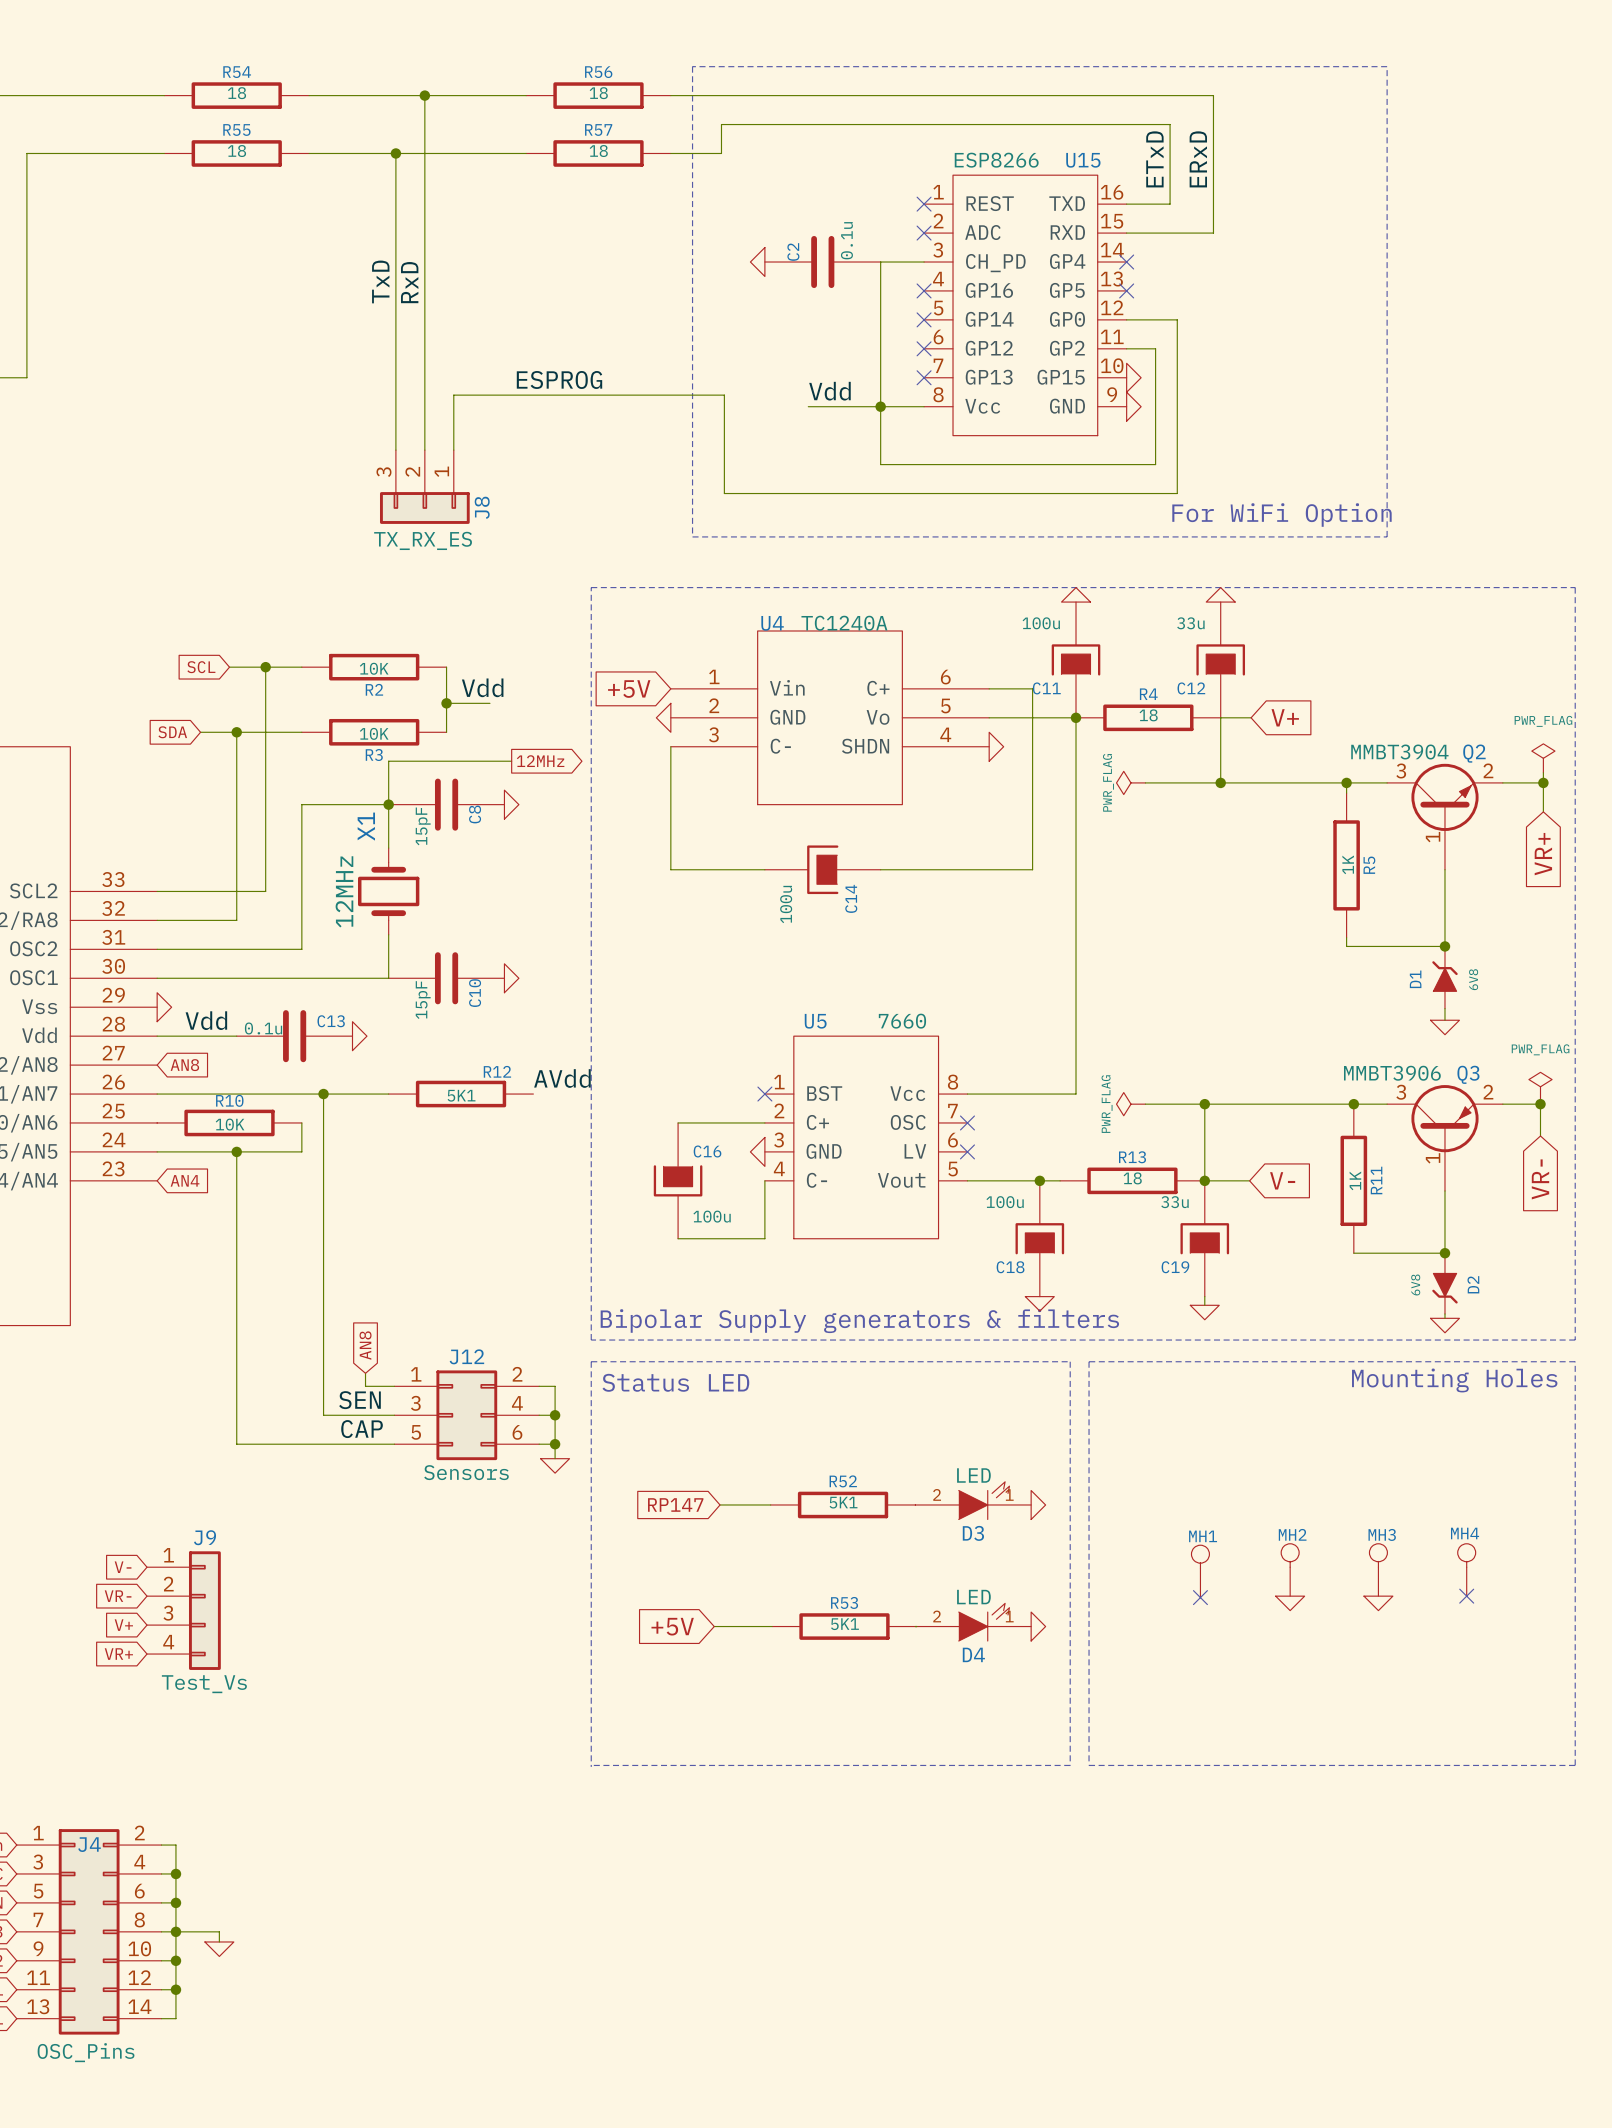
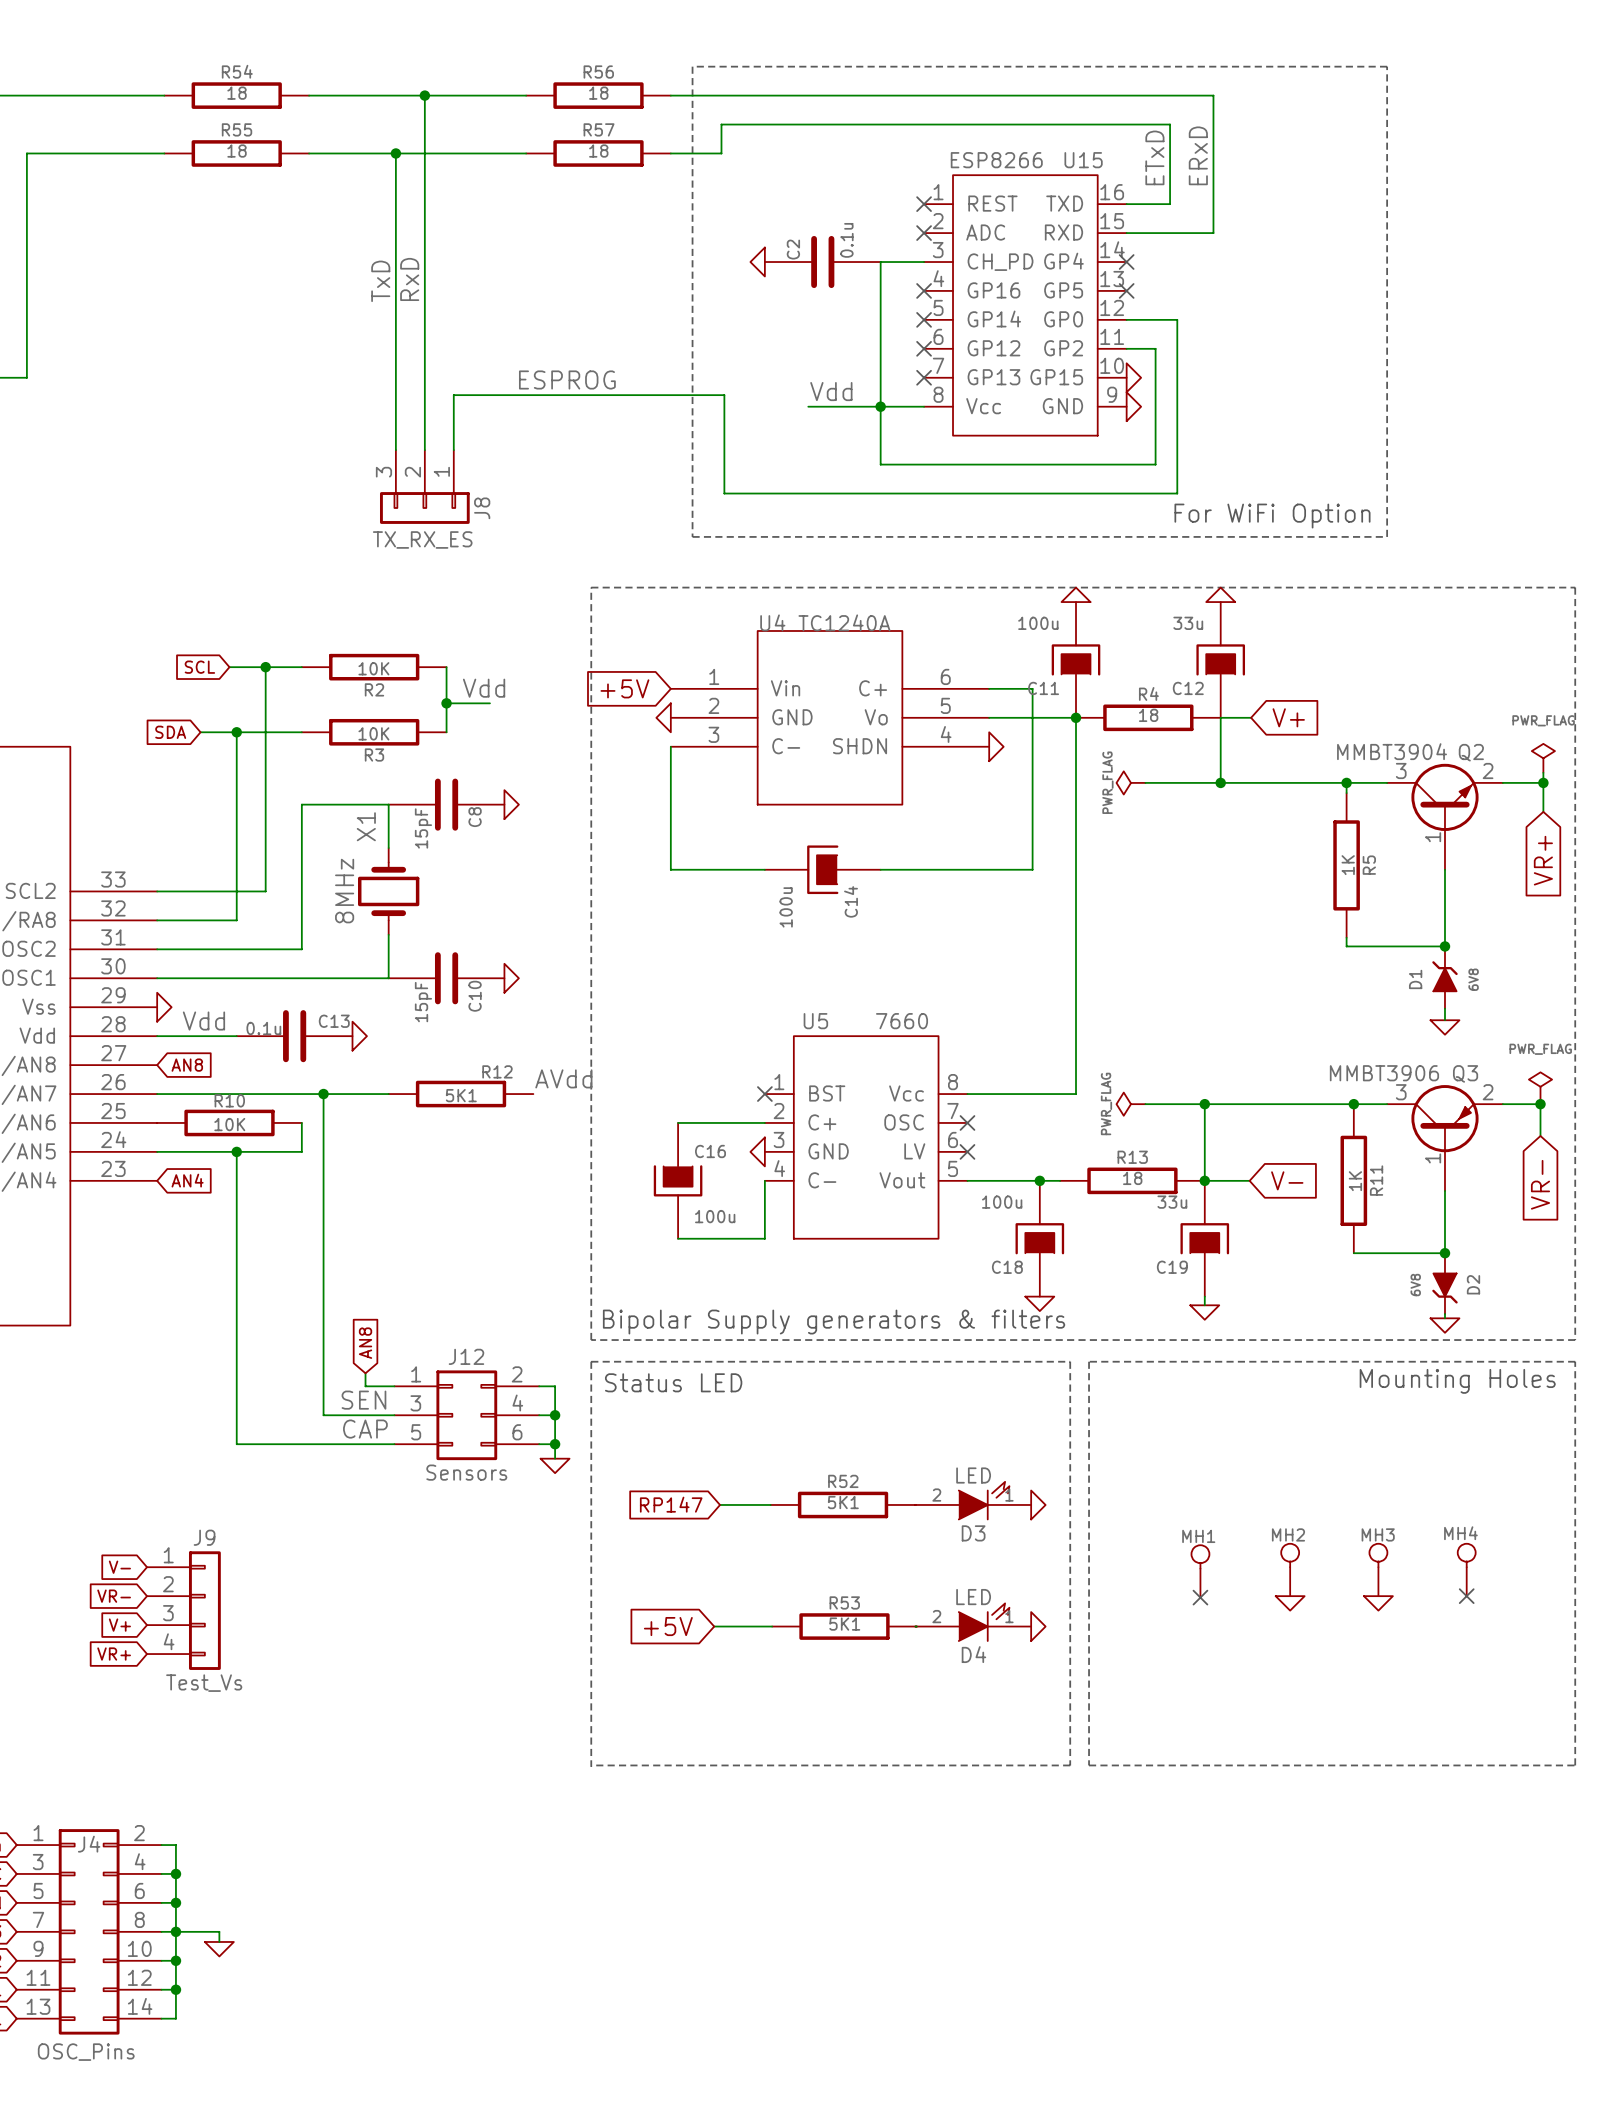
wire: (511, 761) (388, 761) (388, 804) -> none
global label: 12MHz (540, 761) -> none
junction: (388, 804) -> none
X1 value: 12MHz (344, 891) -> 8MHz (344, 891)

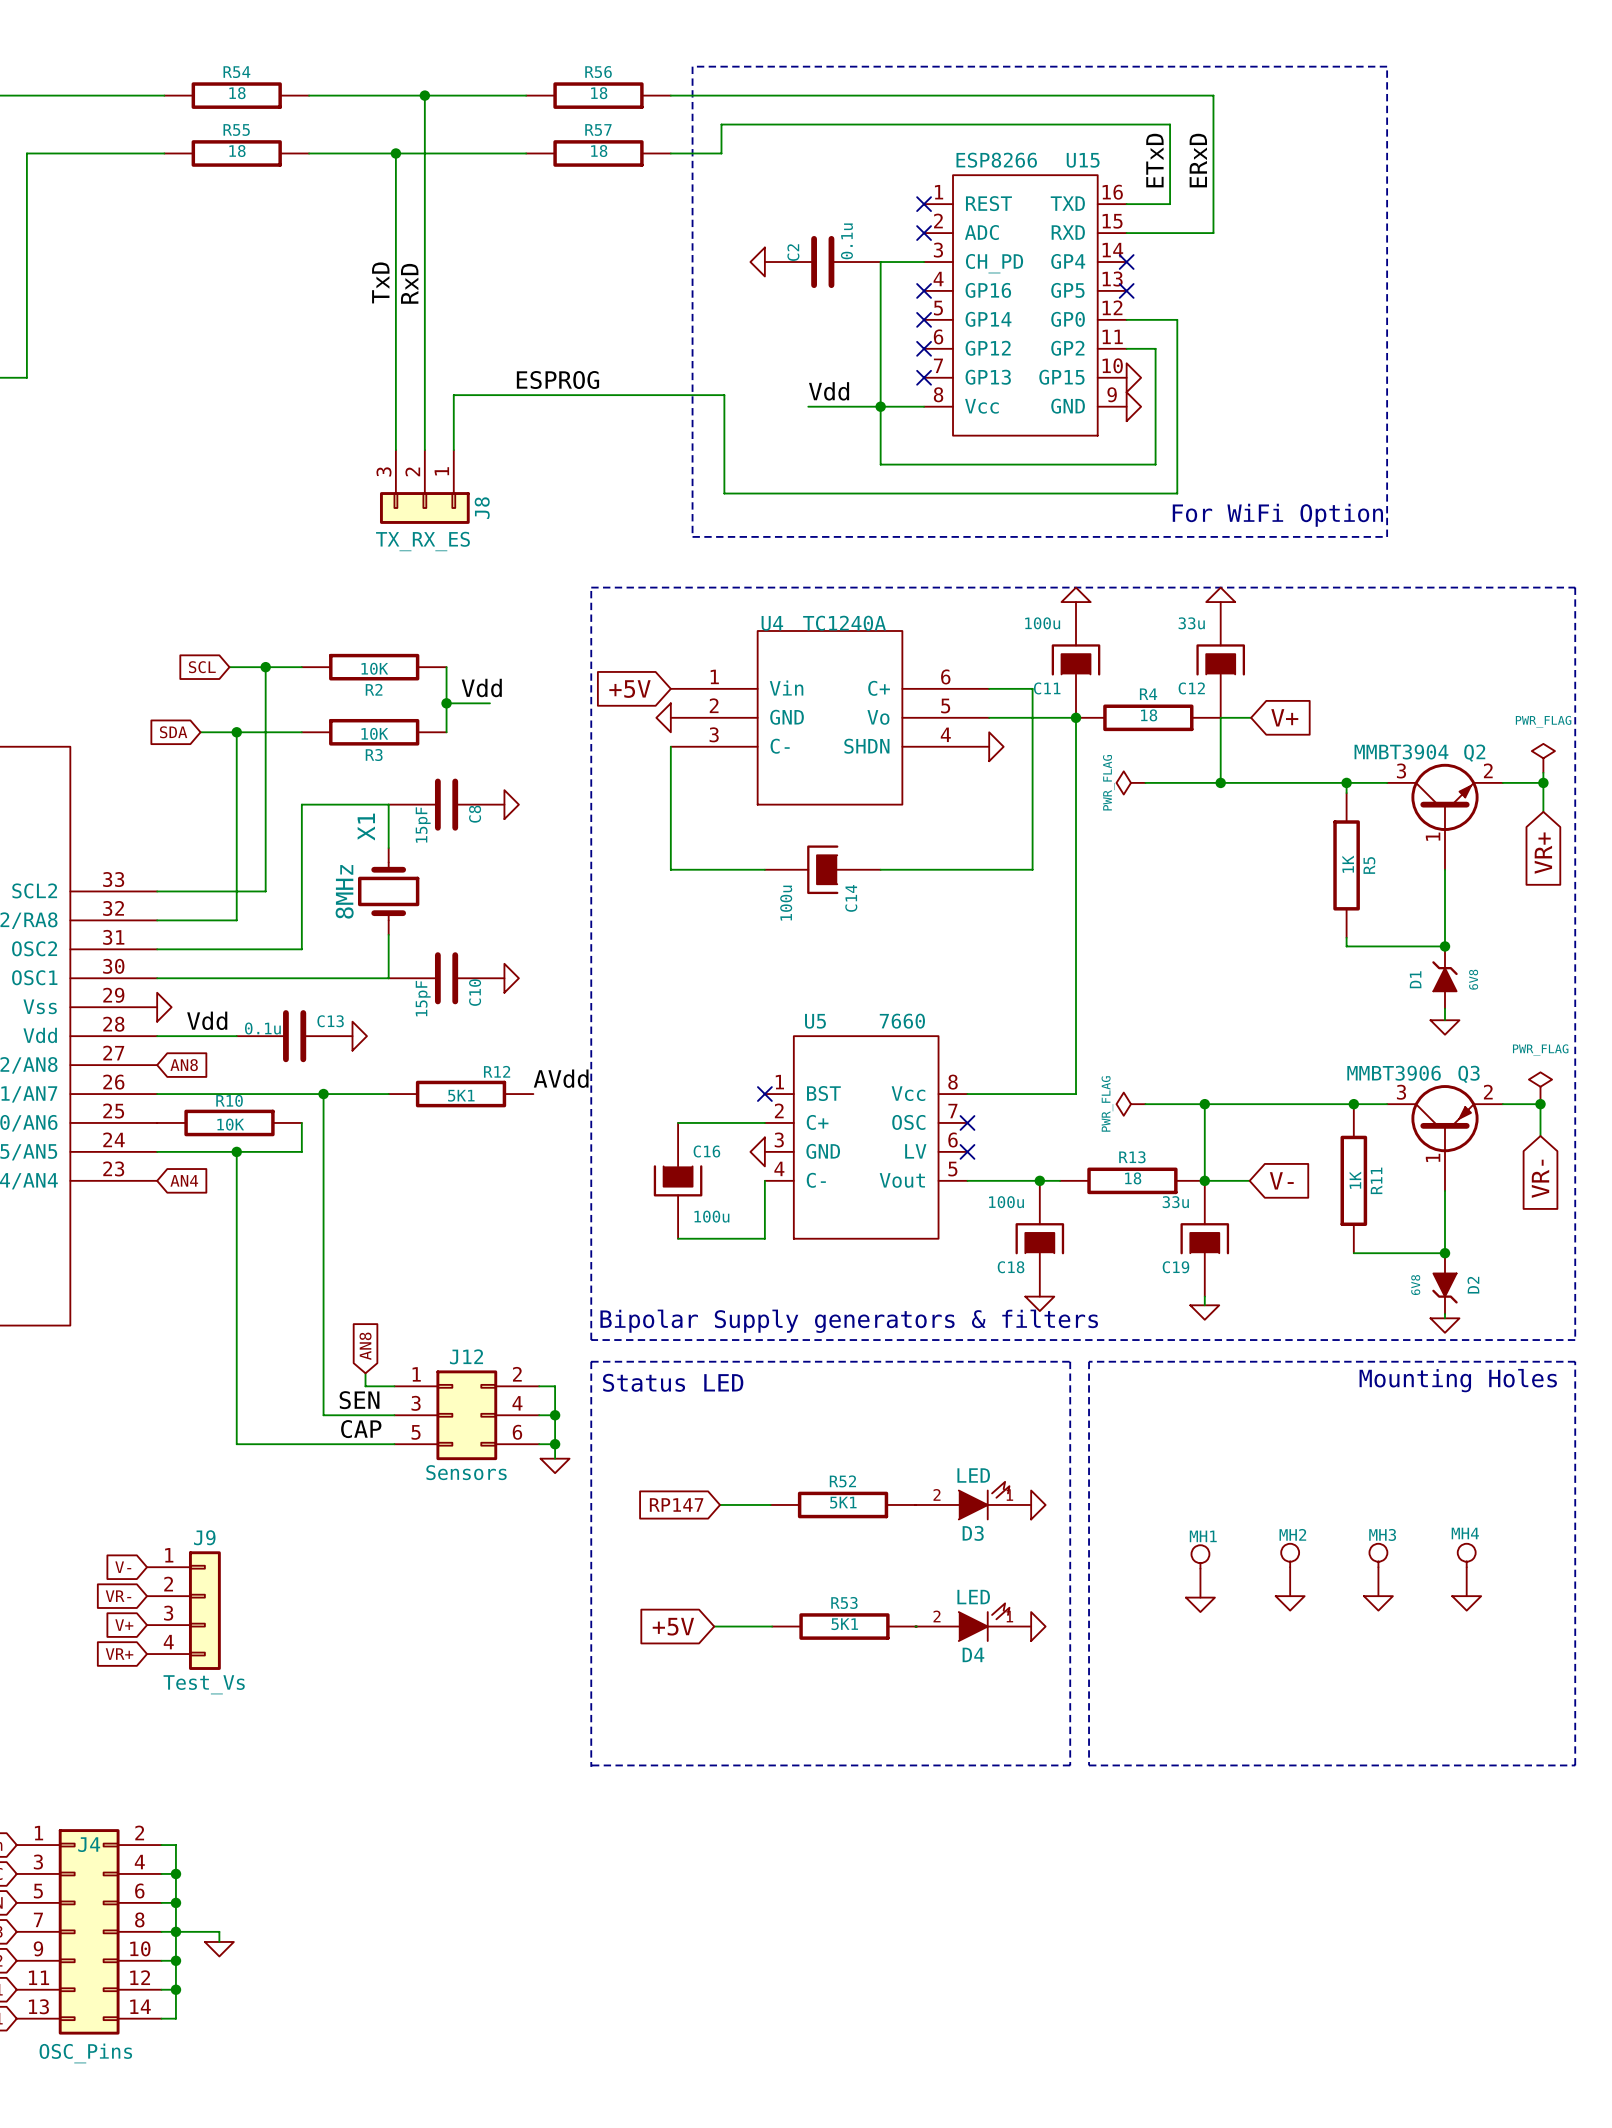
no-connect mark: (1466, 1596) -> none
no-connect mark: (1200, 1597) -> none
power symbol: none -> (1466, 1603)
power symbol: none -> (1200, 1604)

